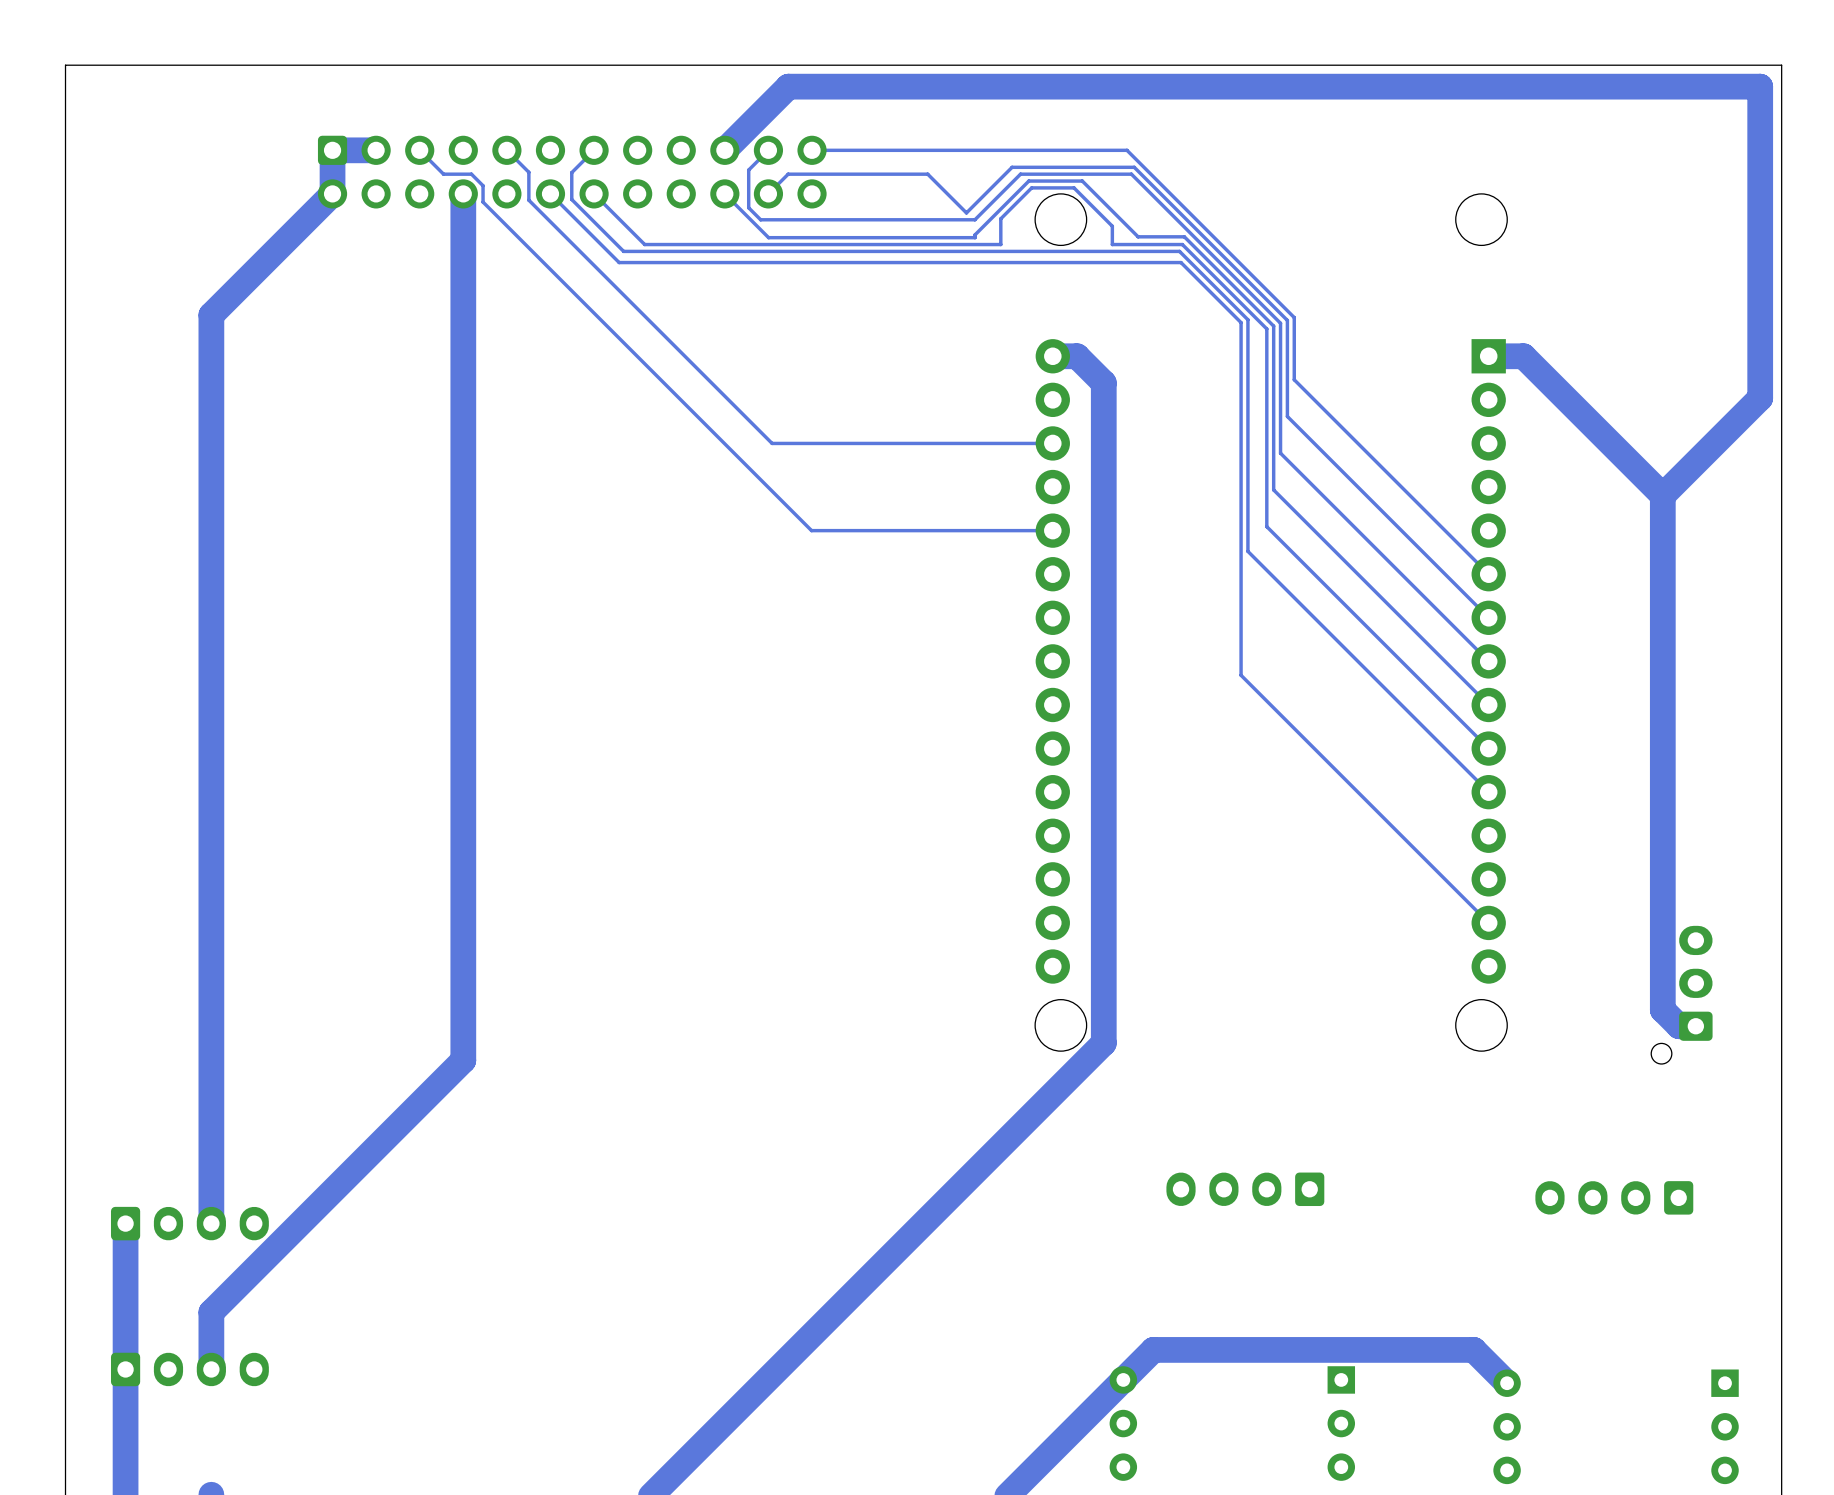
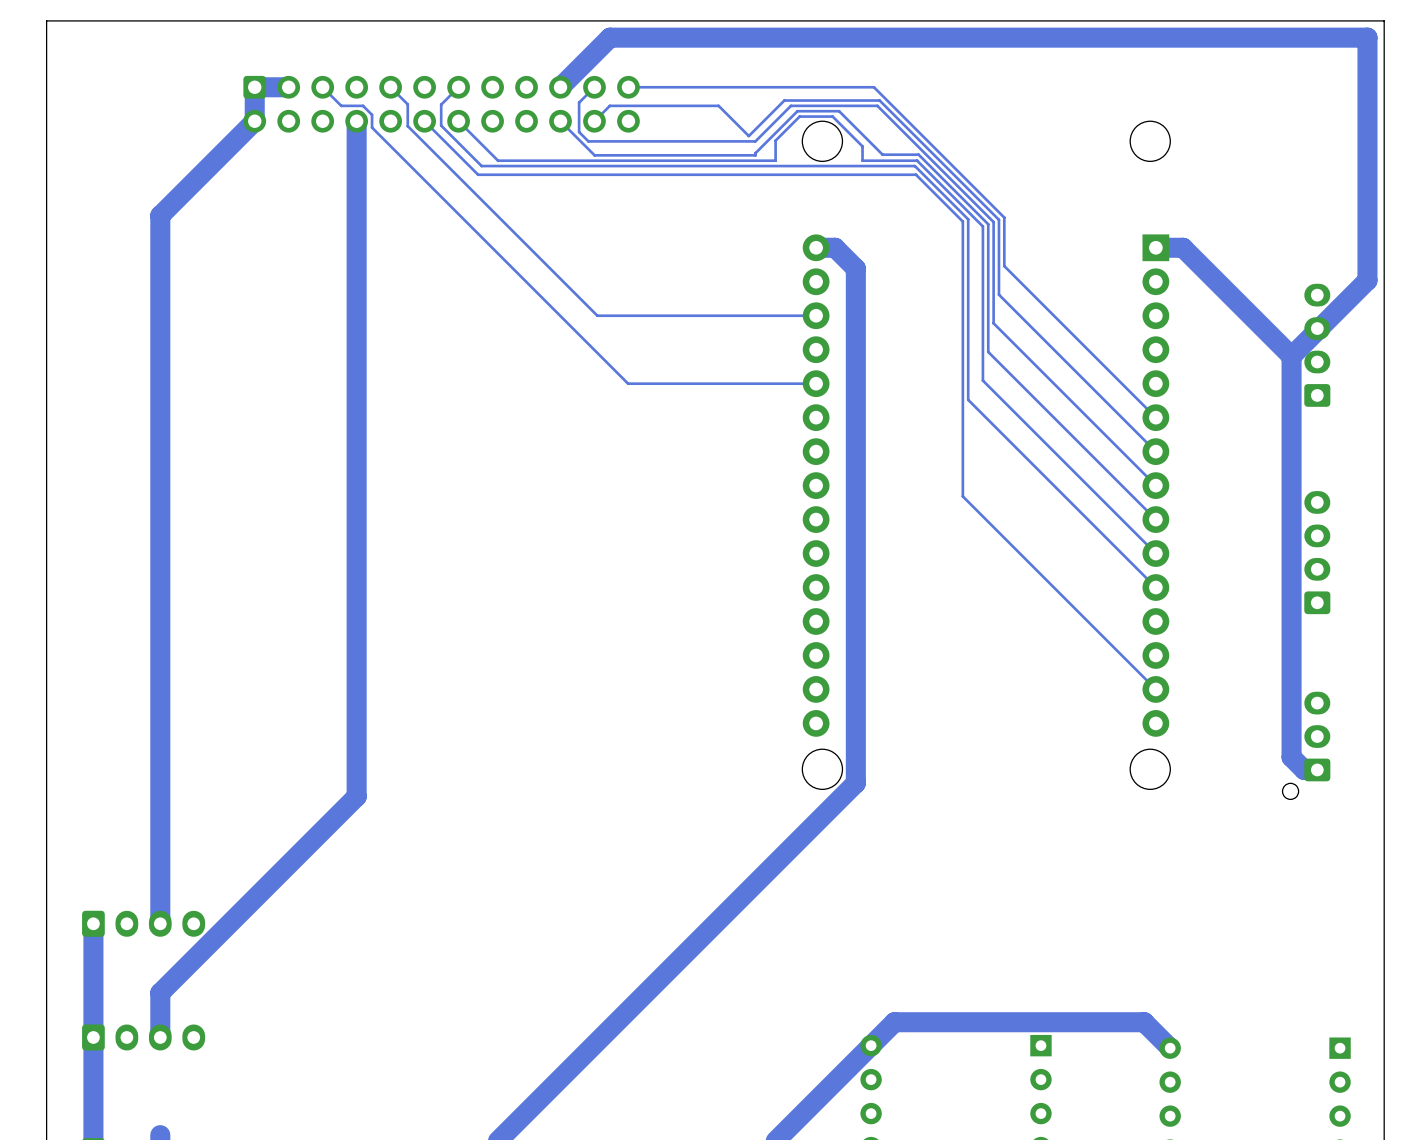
part: none -> (1317, 345)
part: none -> (1317, 552)
part: (1245, 1189) -> none
part: (1614, 1197) -> none

